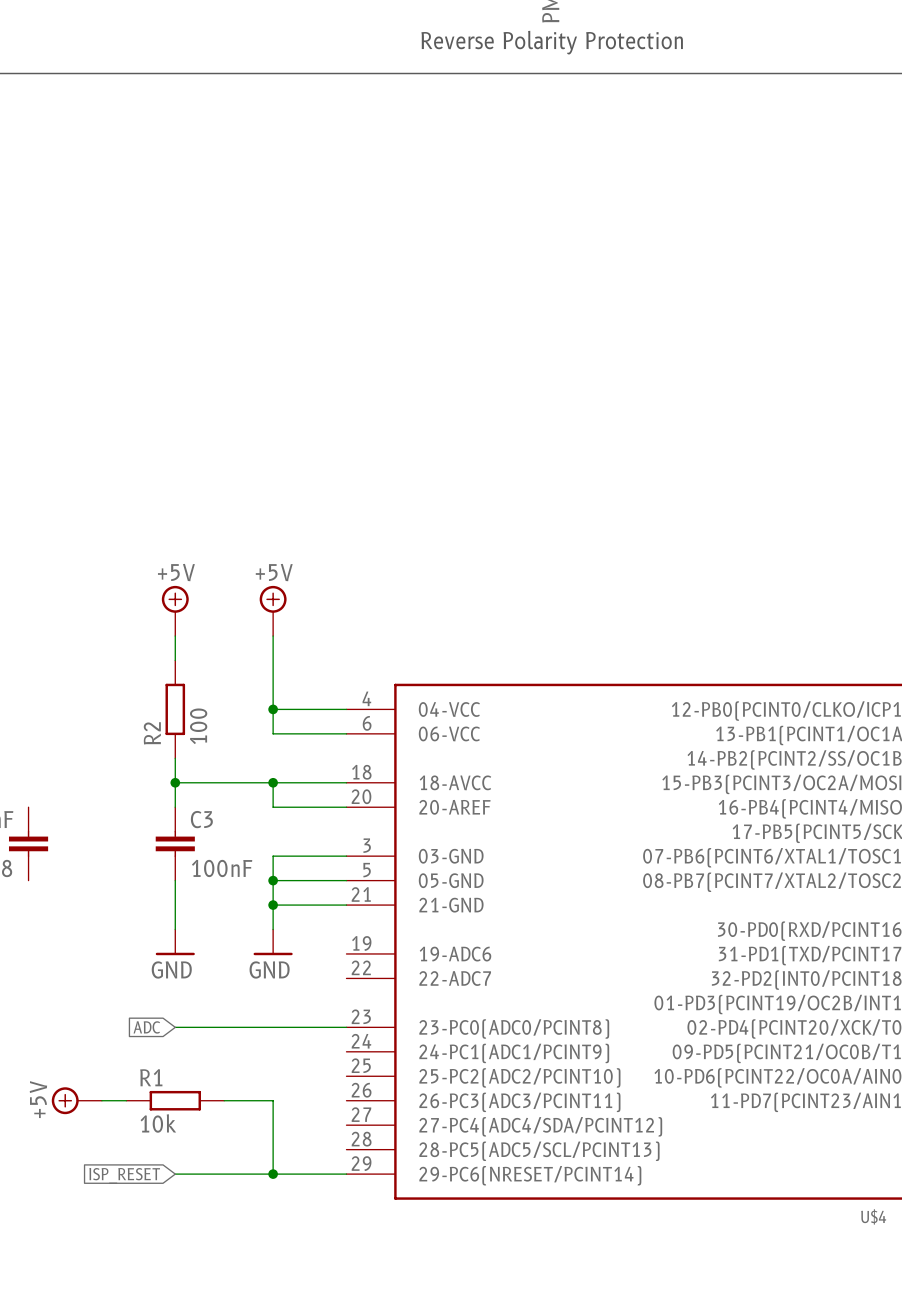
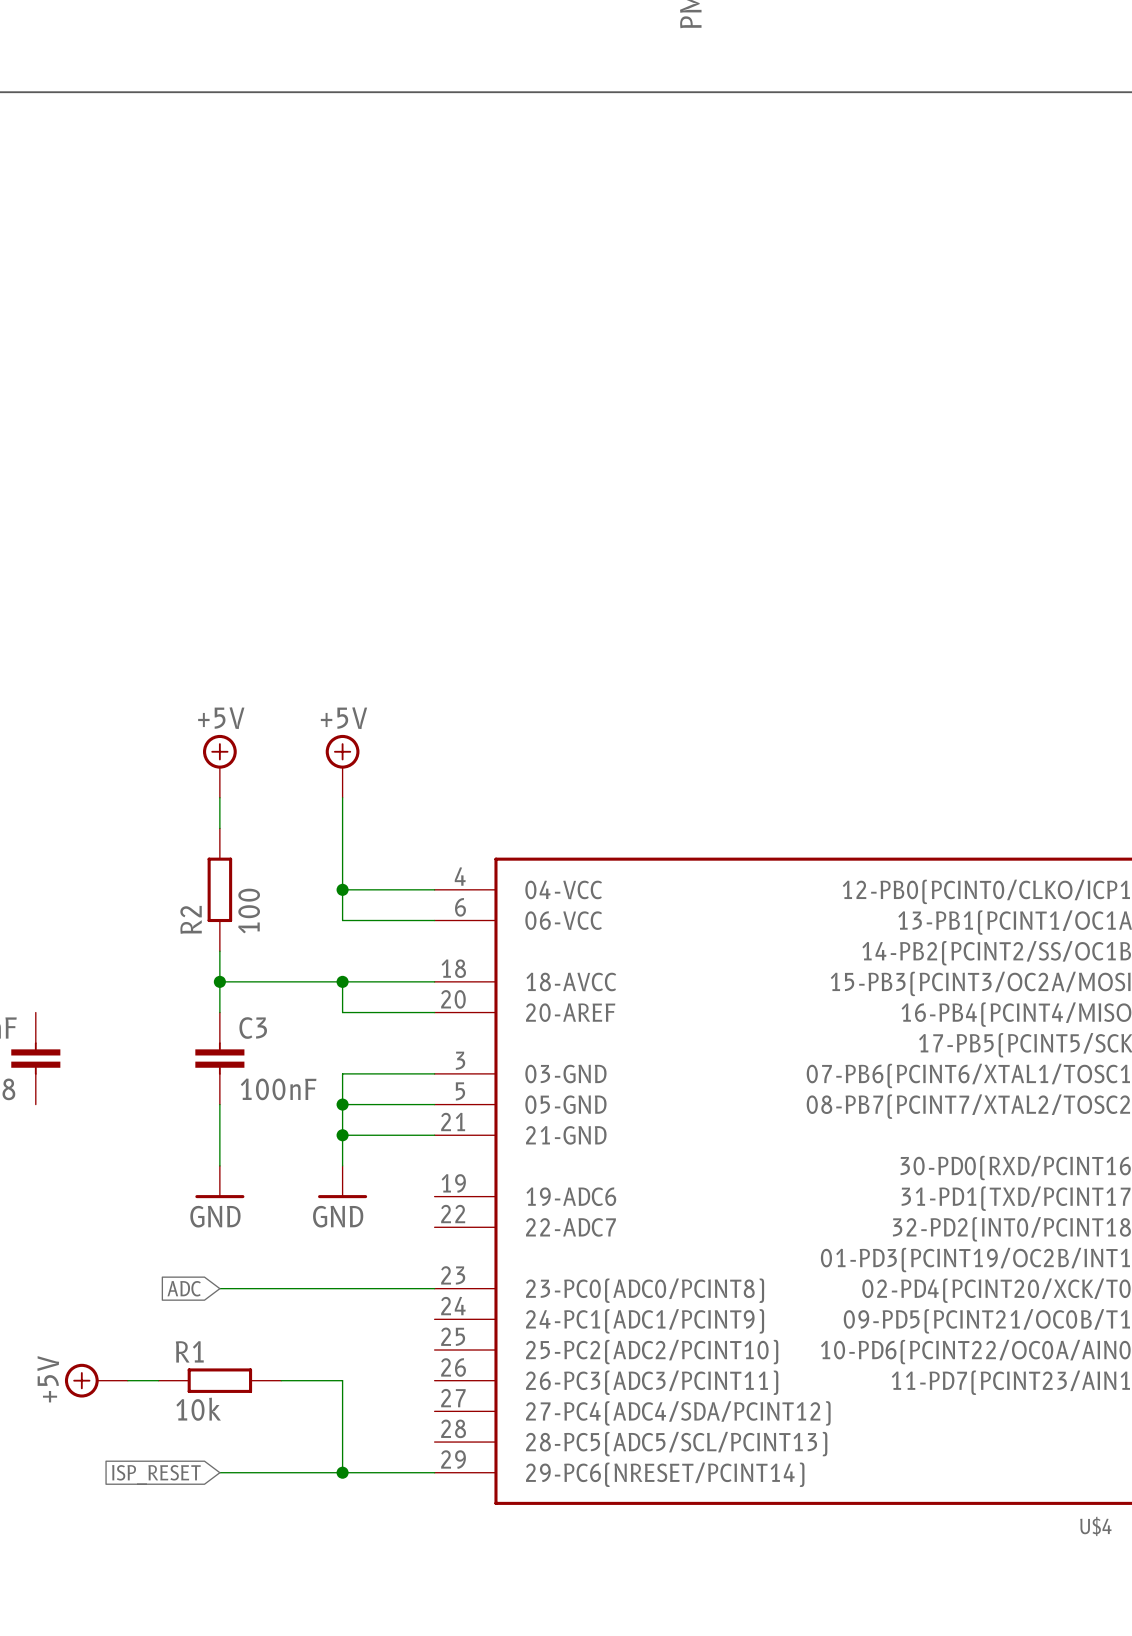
text: Reverse Polarity Protection (552, 42) -> none

